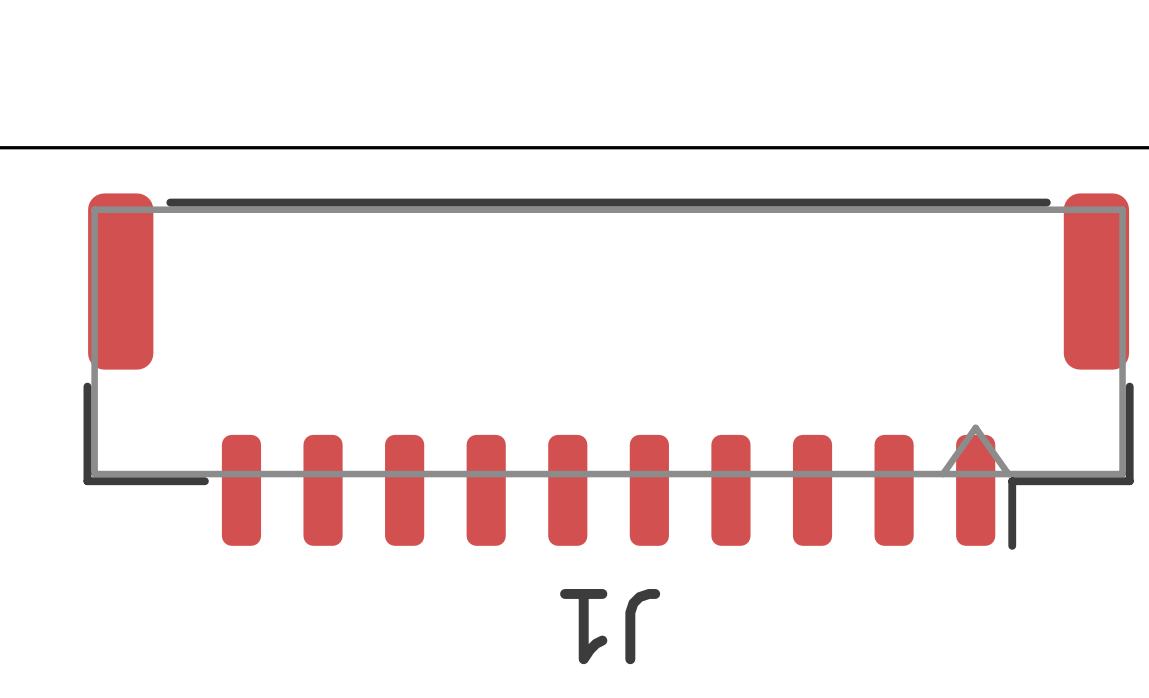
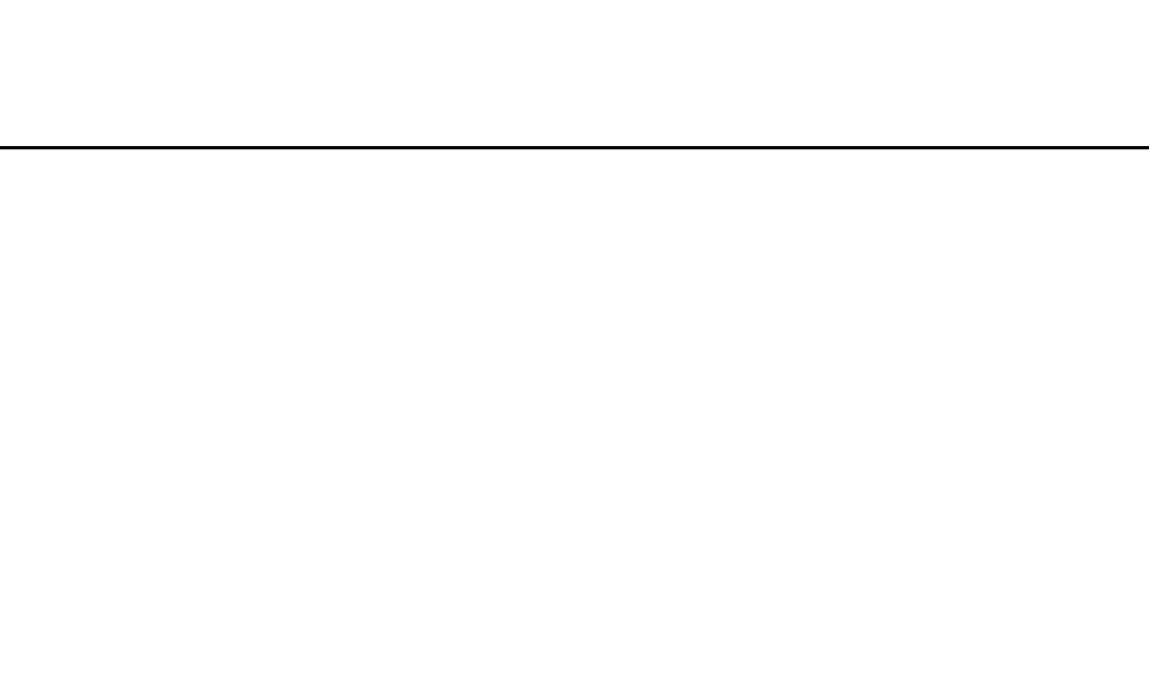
J1: (608, 371) -> none

